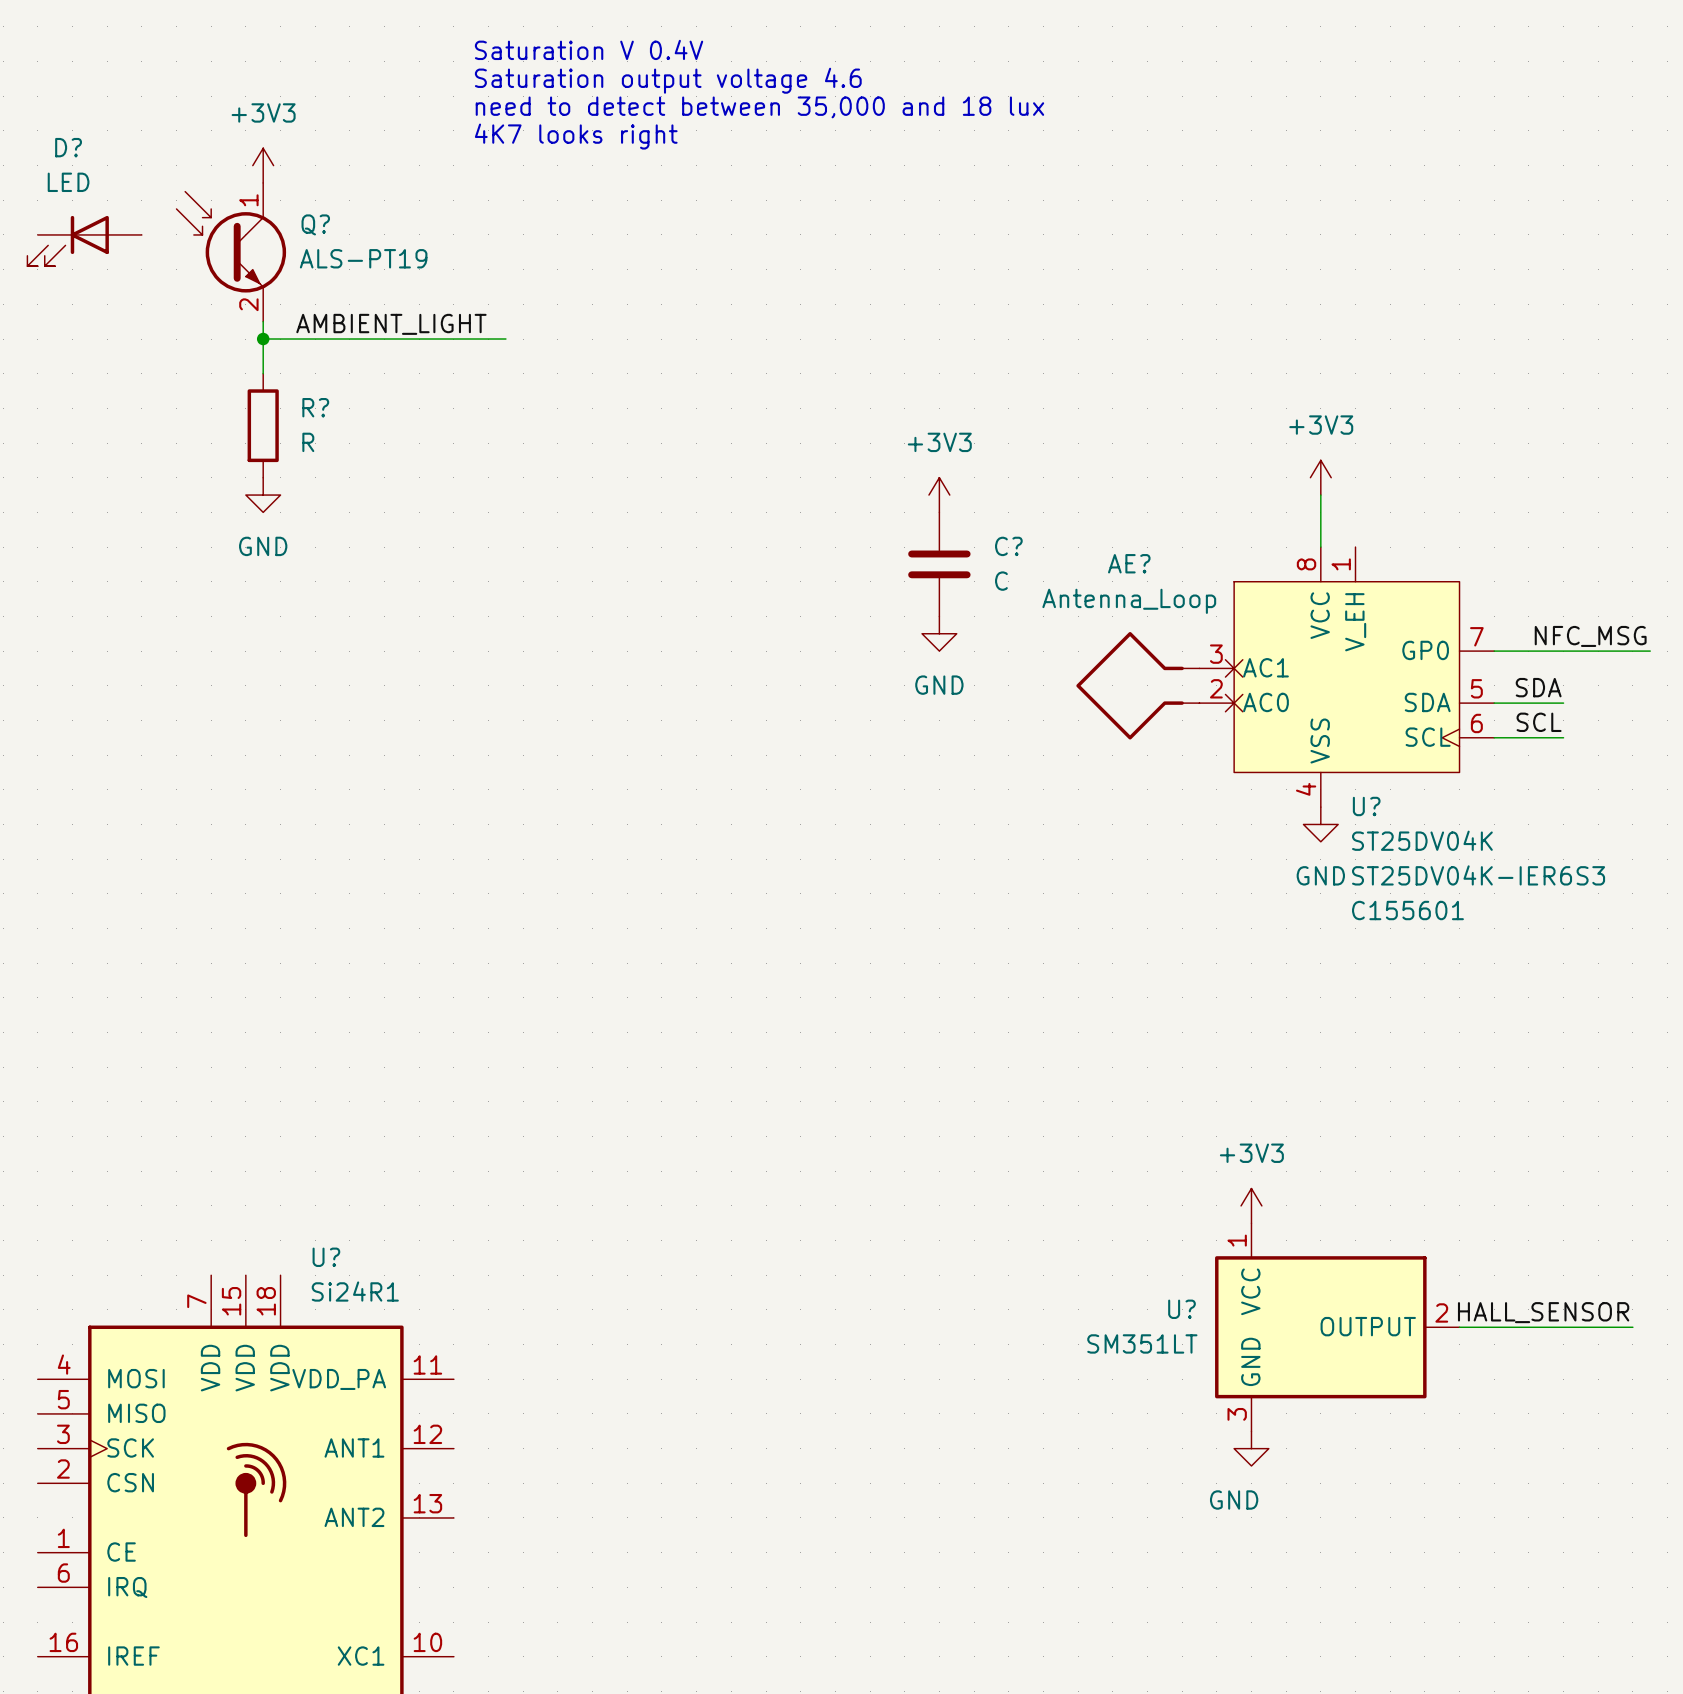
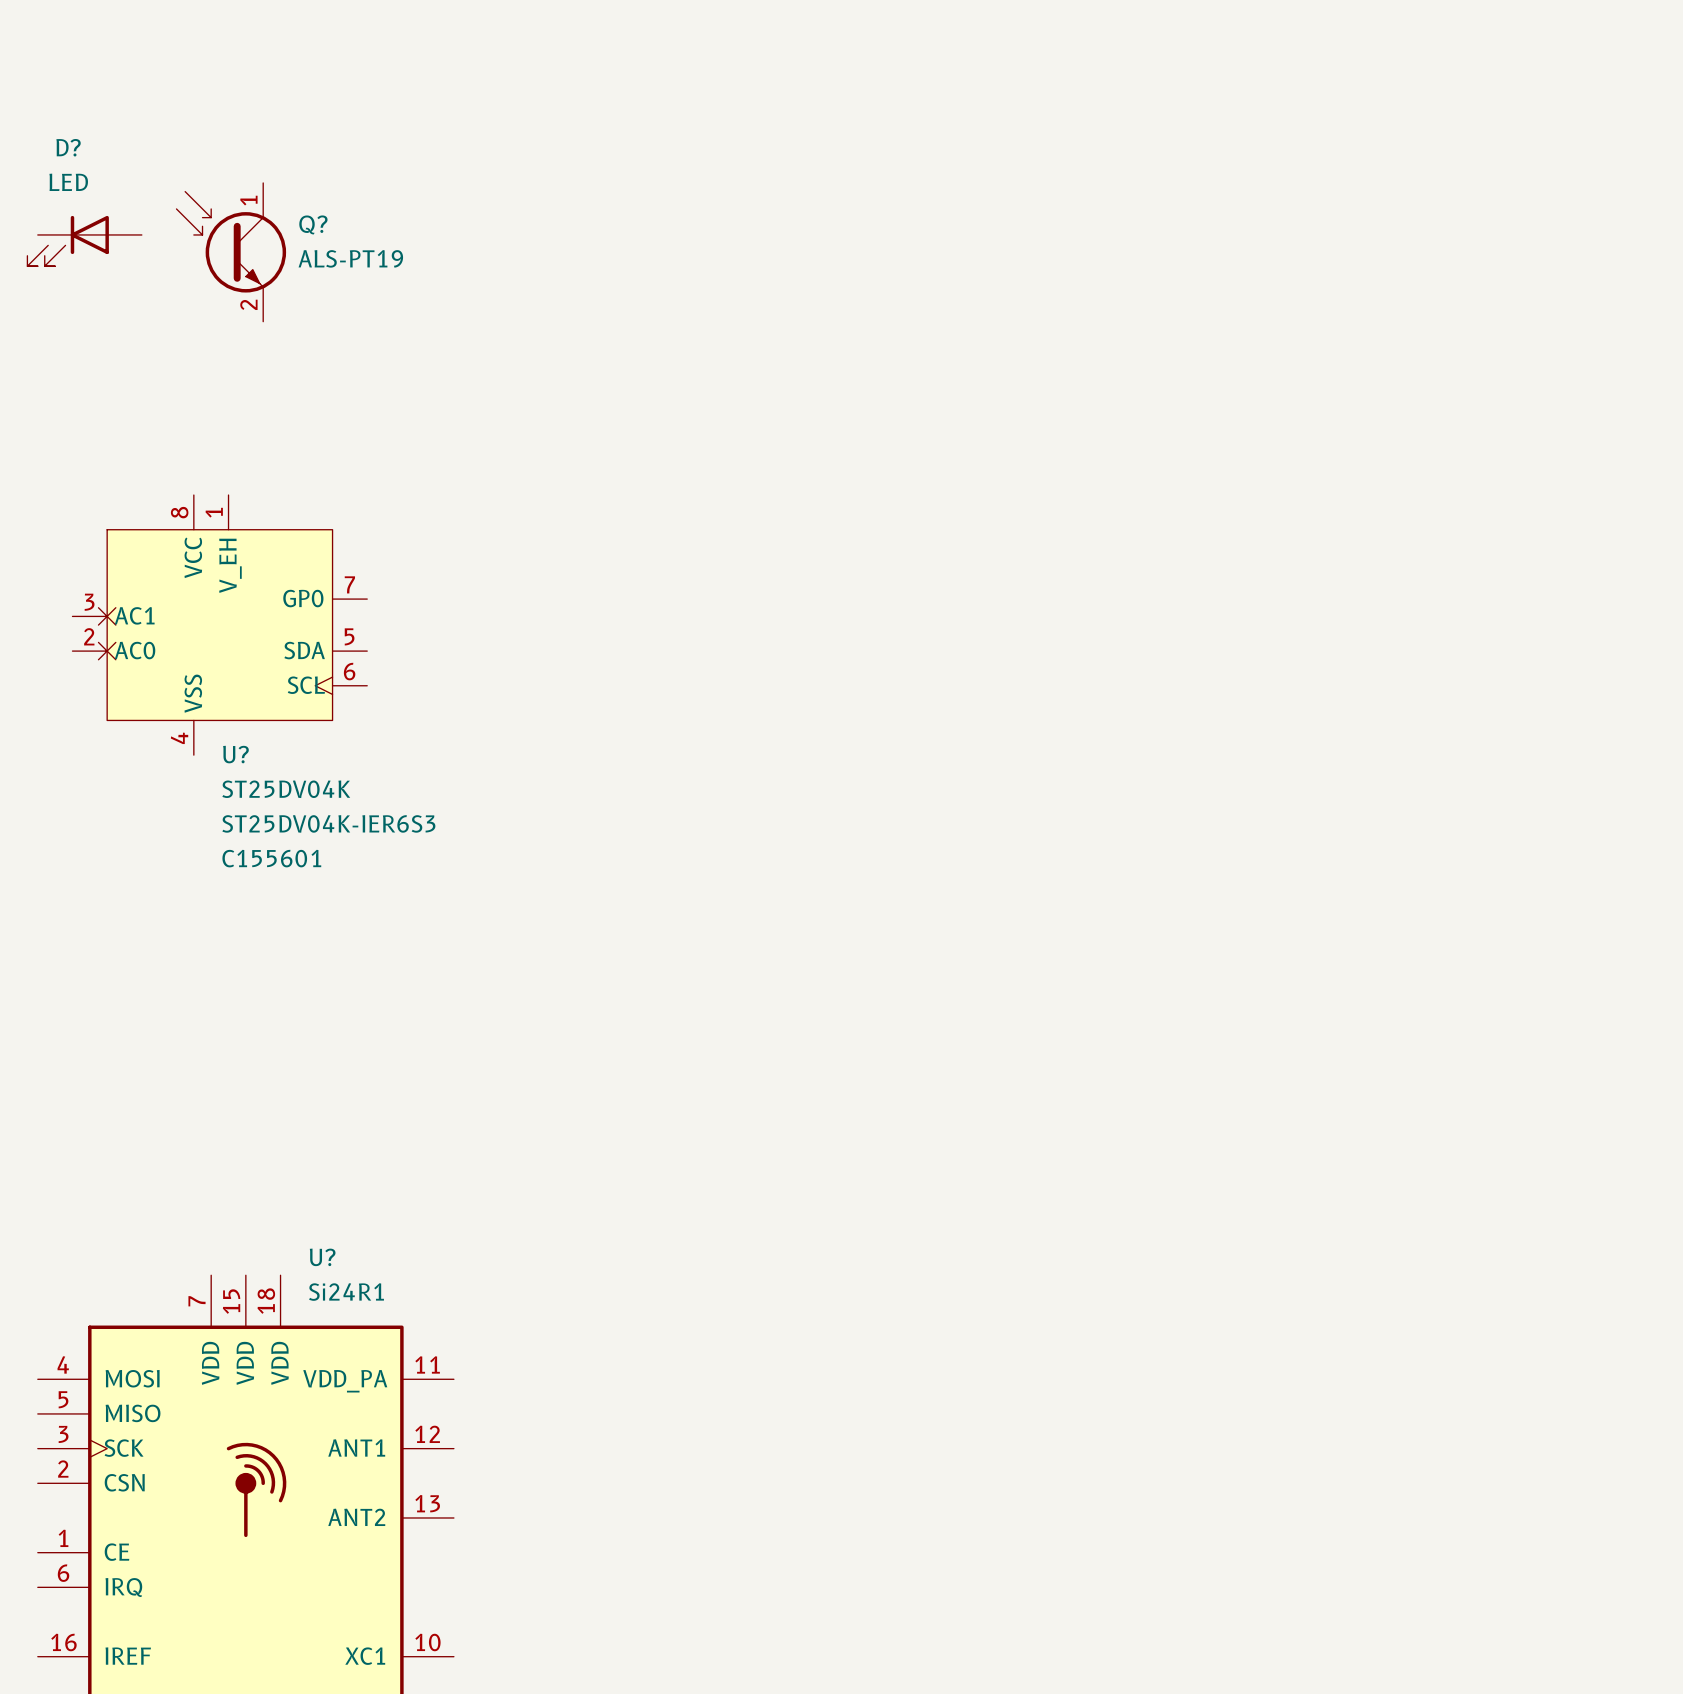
text: Saturation V 0.4V (589, 49) -> none
text: Saturation output voltage 4.6 (668, 80) -> none
text: need to detect between 35,000 and 18 lux (759, 107) -> none
text: 4K7 looks right (576, 136) -> none
power symbol: +3V3 (263, 165) -> none
wire: (263, 321) (263, 373) -> none
label: AMBIENT_LIGHT (391, 324) -> none
wire: (263, 339) (505, 339) -> none
junction: (263, 339) -> none
R?: R (263, 425) -> none
power symbol: +3V3 (1320, 477) -> none
power symbol: GND (263, 495) -> none
power symbol: +3V3 (939, 495) -> none
wire: (1320, 495) (1320, 547) -> none
C?: C (939, 564) -> none
U?: none -> ST25DV04K (219, 625)
power symbol: GND (939, 633) -> none
label: NFC_MSG (1590, 636) -> none
wire: (1494, 651) (1650, 651) -> none
U?: ST25DV04K (1346, 677) -> none
AE?: Antenna_Loop (1137, 685) -> none
label: SDA (1538, 687) -> none
wire: (1494, 703) (1563, 703) -> none
label: SCL (1539, 722) -> none
wire: (1494, 737) (1563, 737) -> none
power symbol: GND (1320, 824) -> none
power symbol: +3V3 (1251, 1205) -> none
label: HALL_SENSOR (1543, 1312) -> none
U?: SM351LT (1337, 1327) -> none
wire: (1459, 1327) (1632, 1327) -> none
power symbol: GND (1251, 1448) -> none

